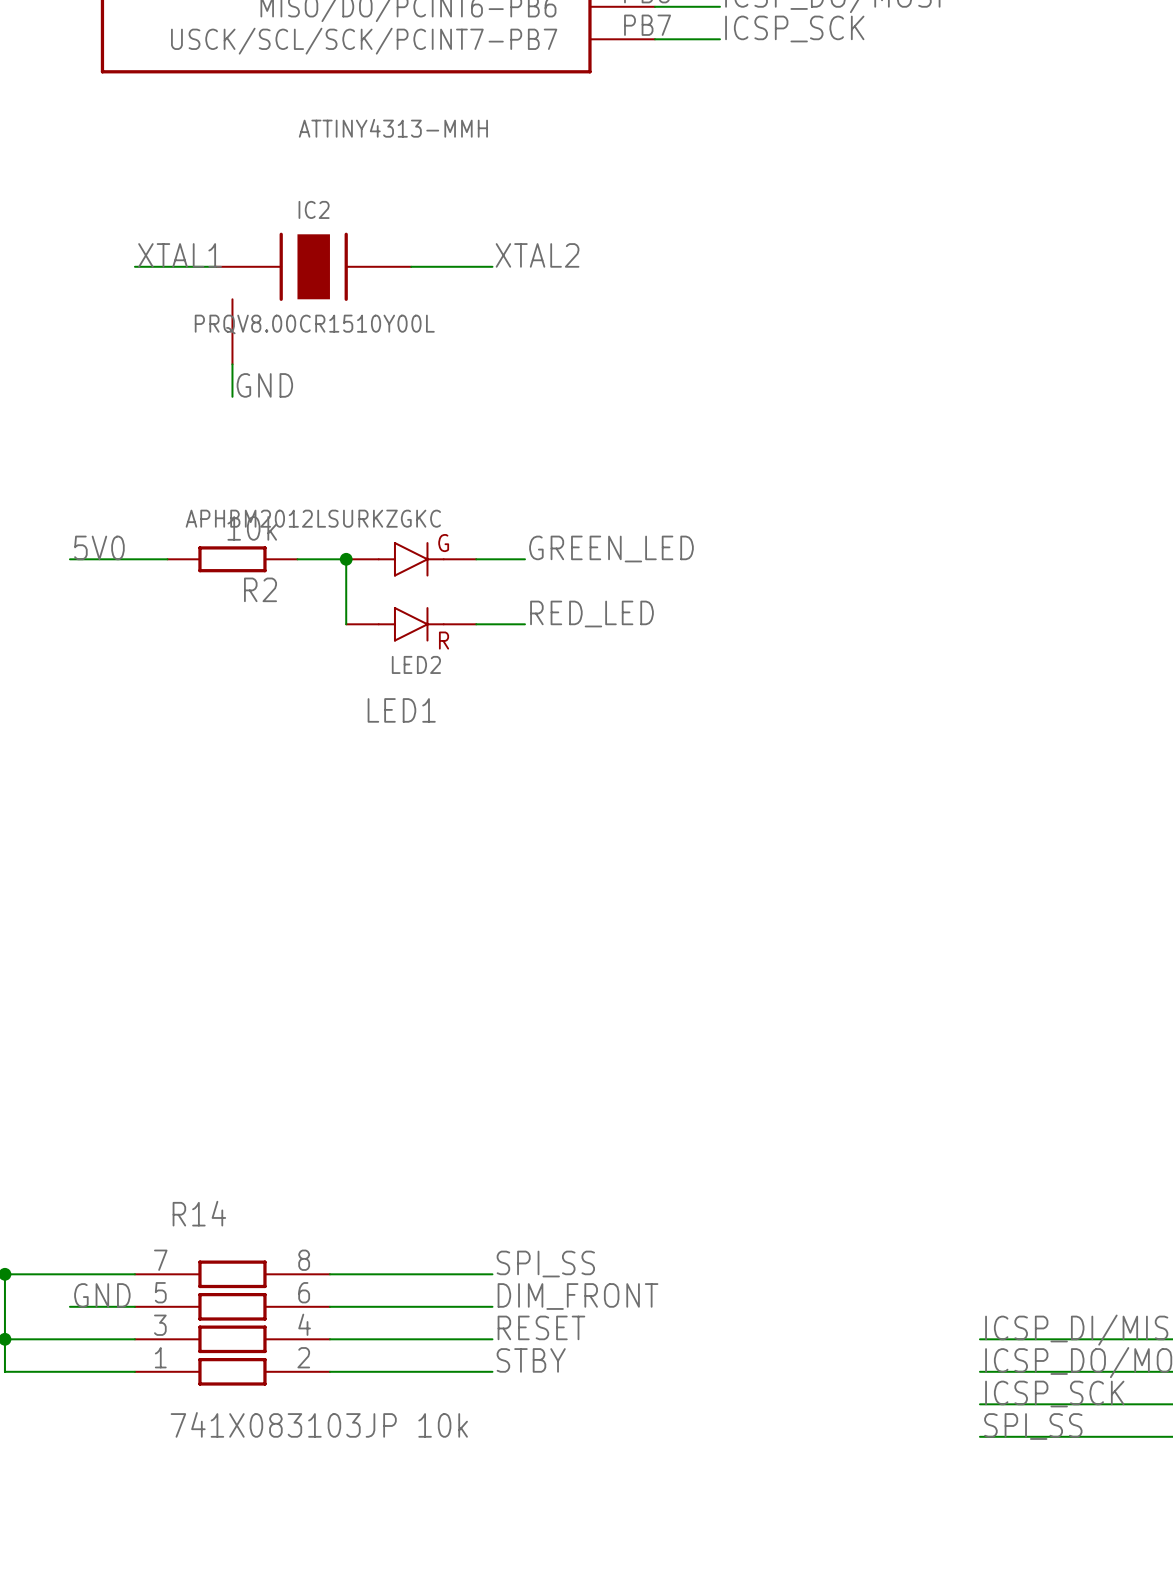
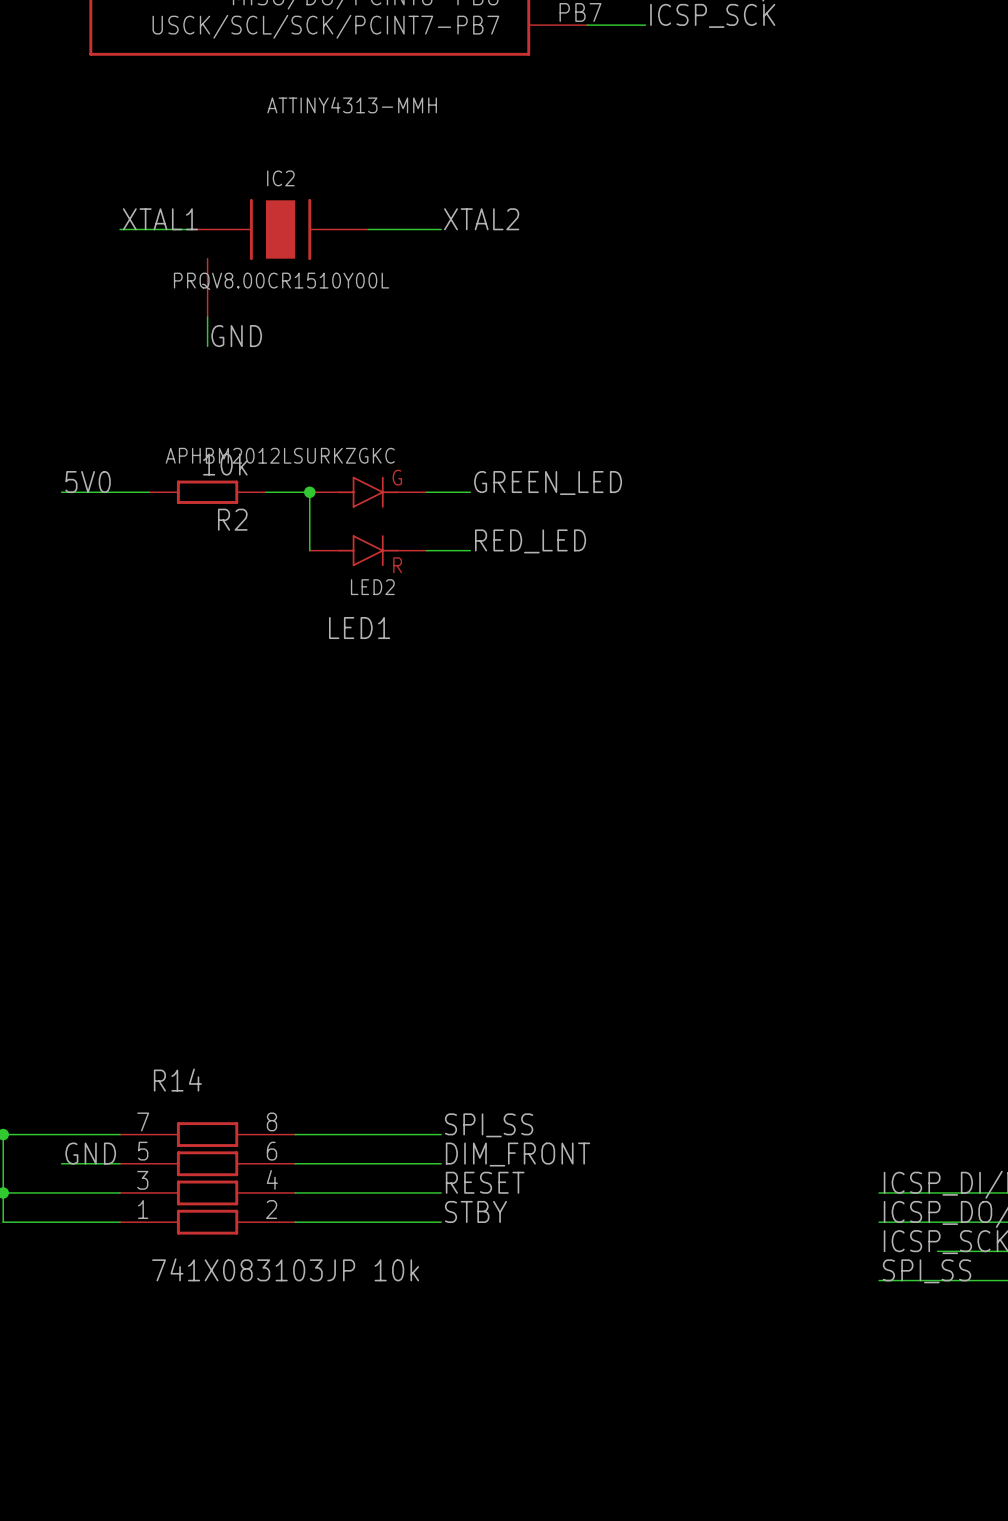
wire: (979, 1404) (1044, 1404) -> none

